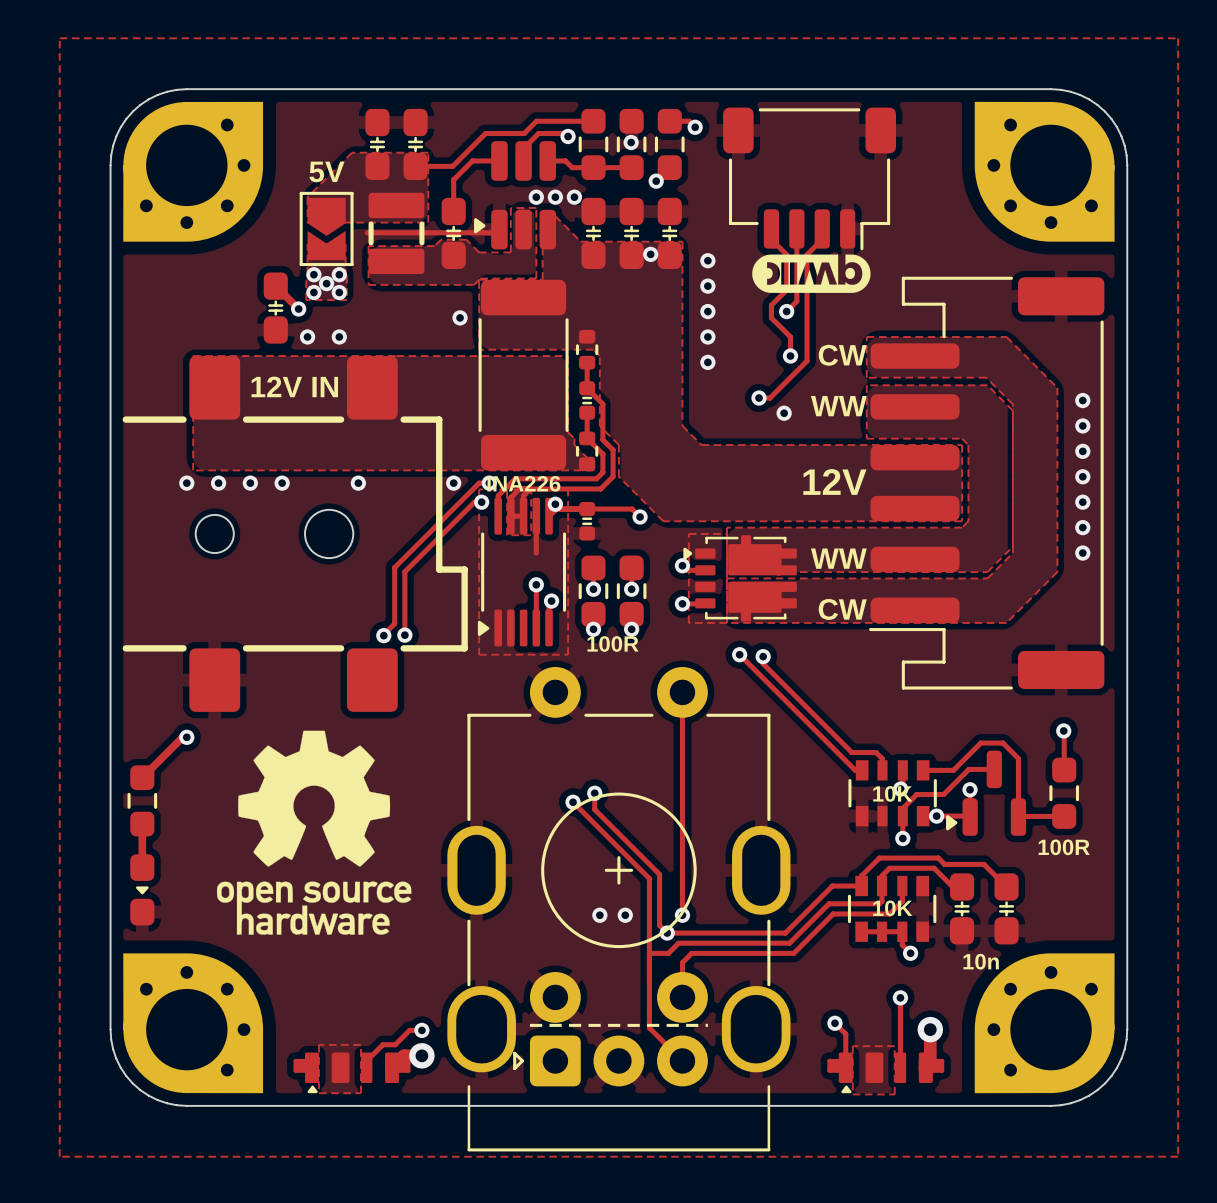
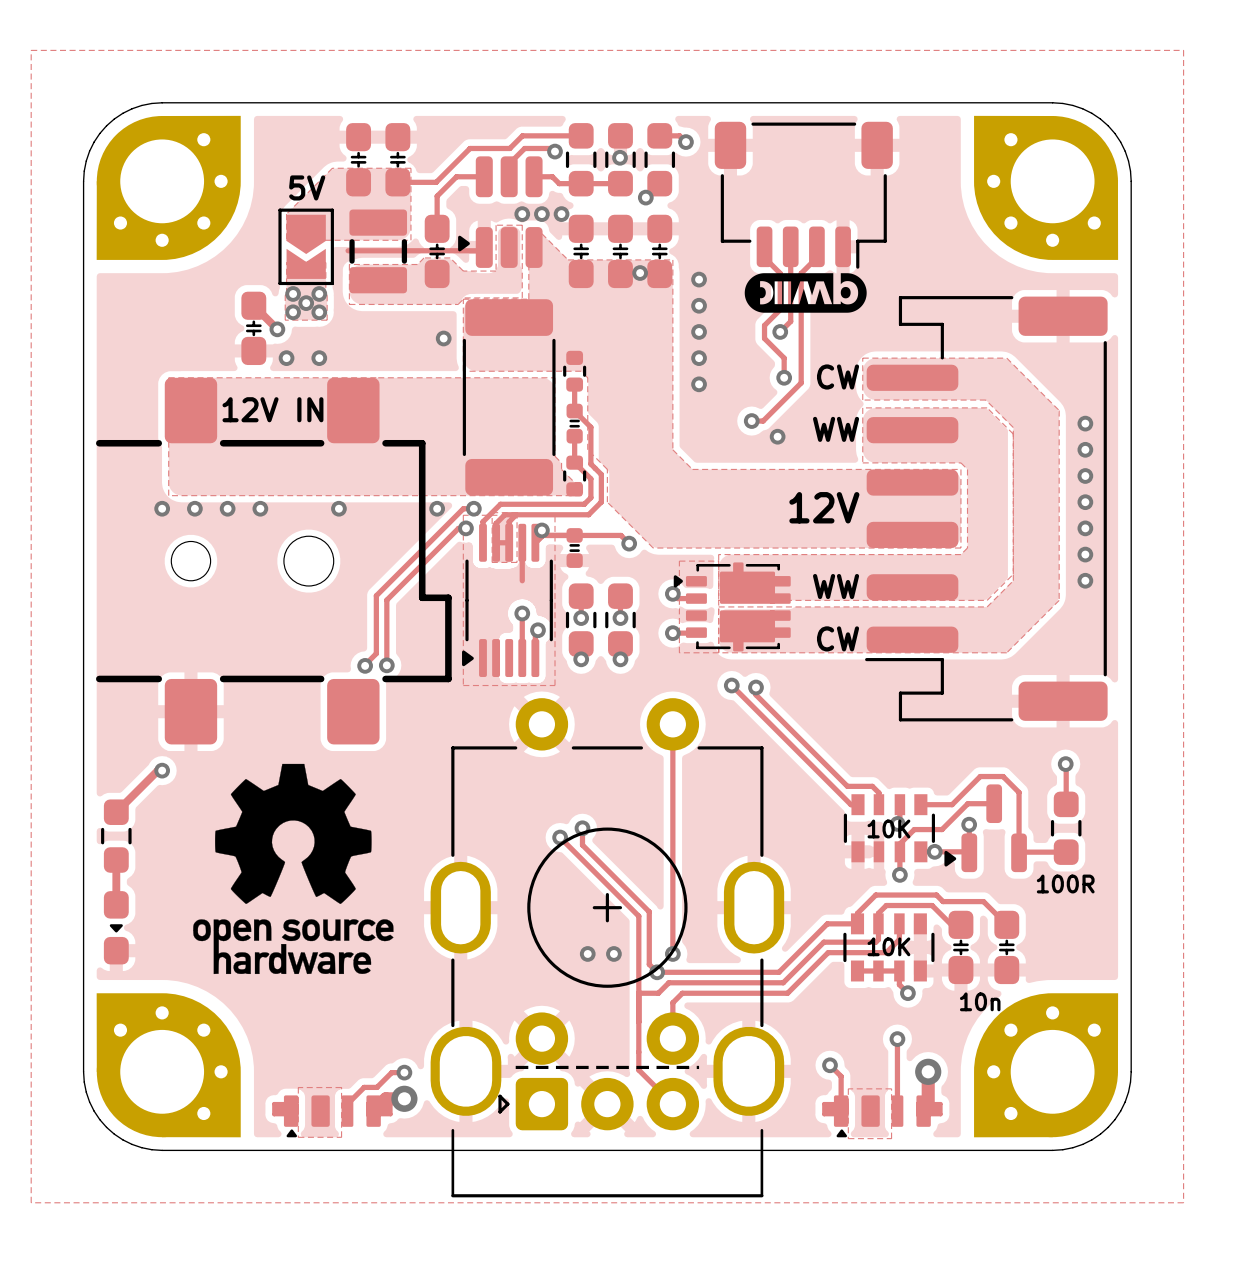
text: INA226 (523, 483) -> none
text: 100R (613, 643) -> none

